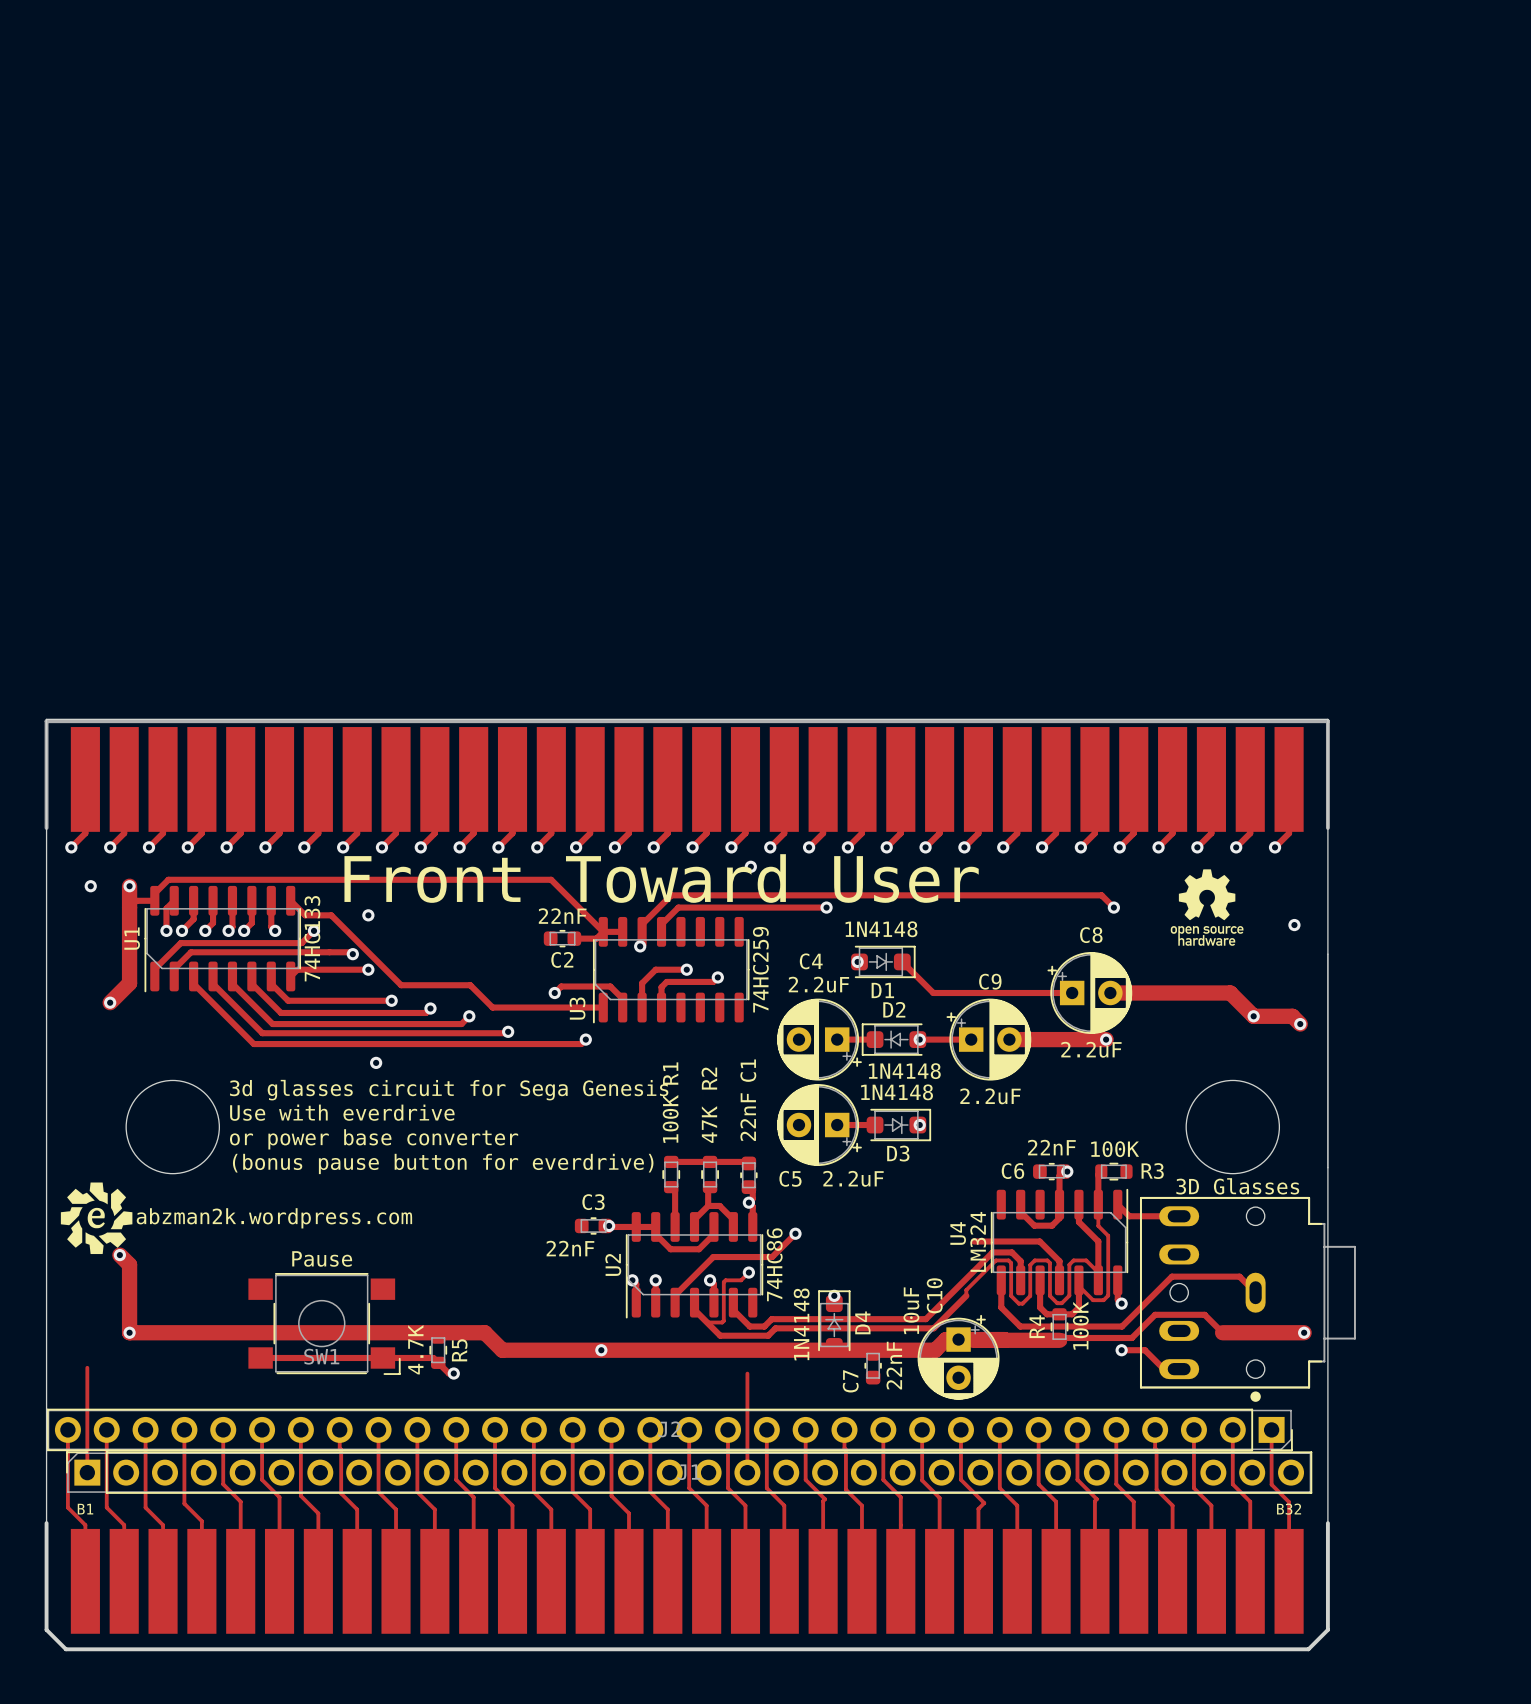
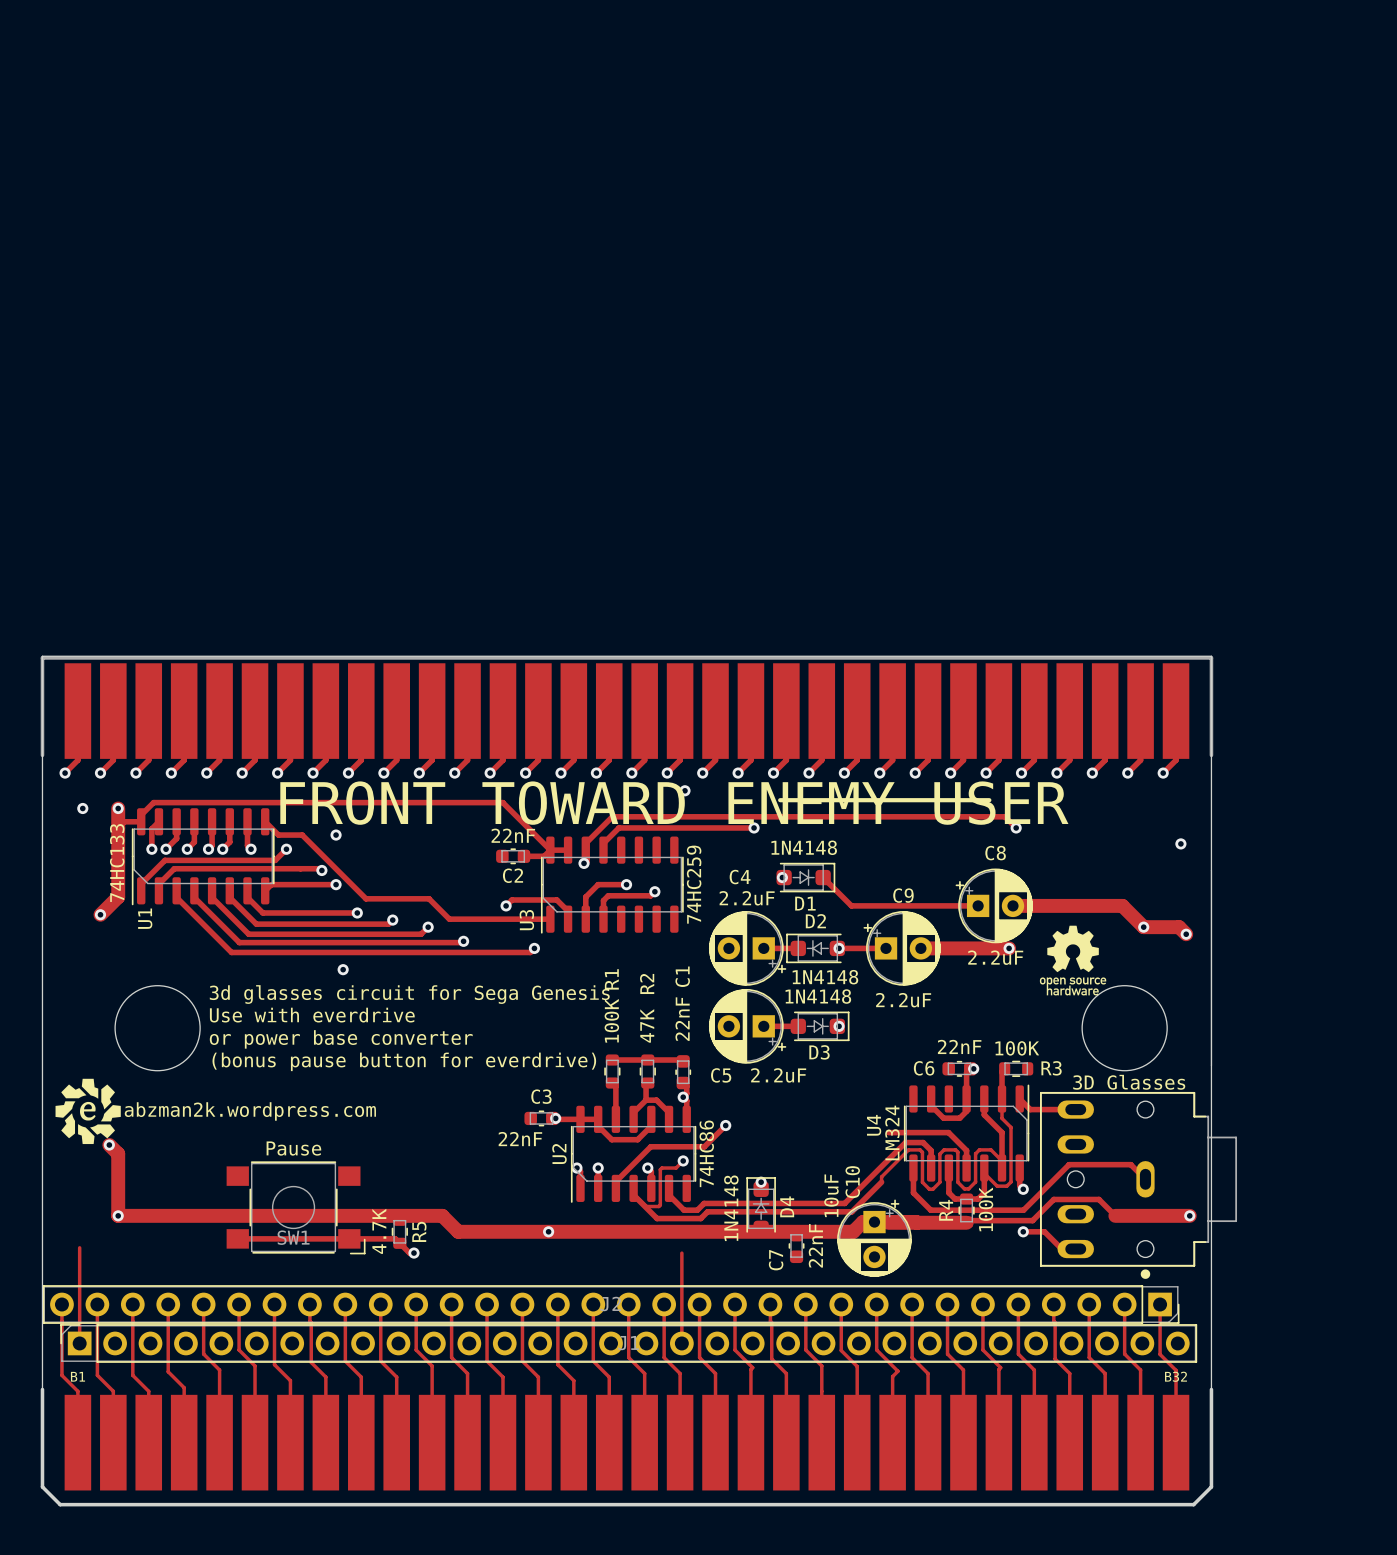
line: none -> (780, 800) (989, 800)
text: Front Toward User (661, 878) -> none
text: none -> FRONT TOWARD ENEMY USER (674, 803)
drawing position: (1207, 907) -> (1073, 960)
U1 name position: U1 (132, 938) -> U1 (145, 918)
U1 value position: 74HC133 (312, 938) -> 74HC133 (117, 863)

